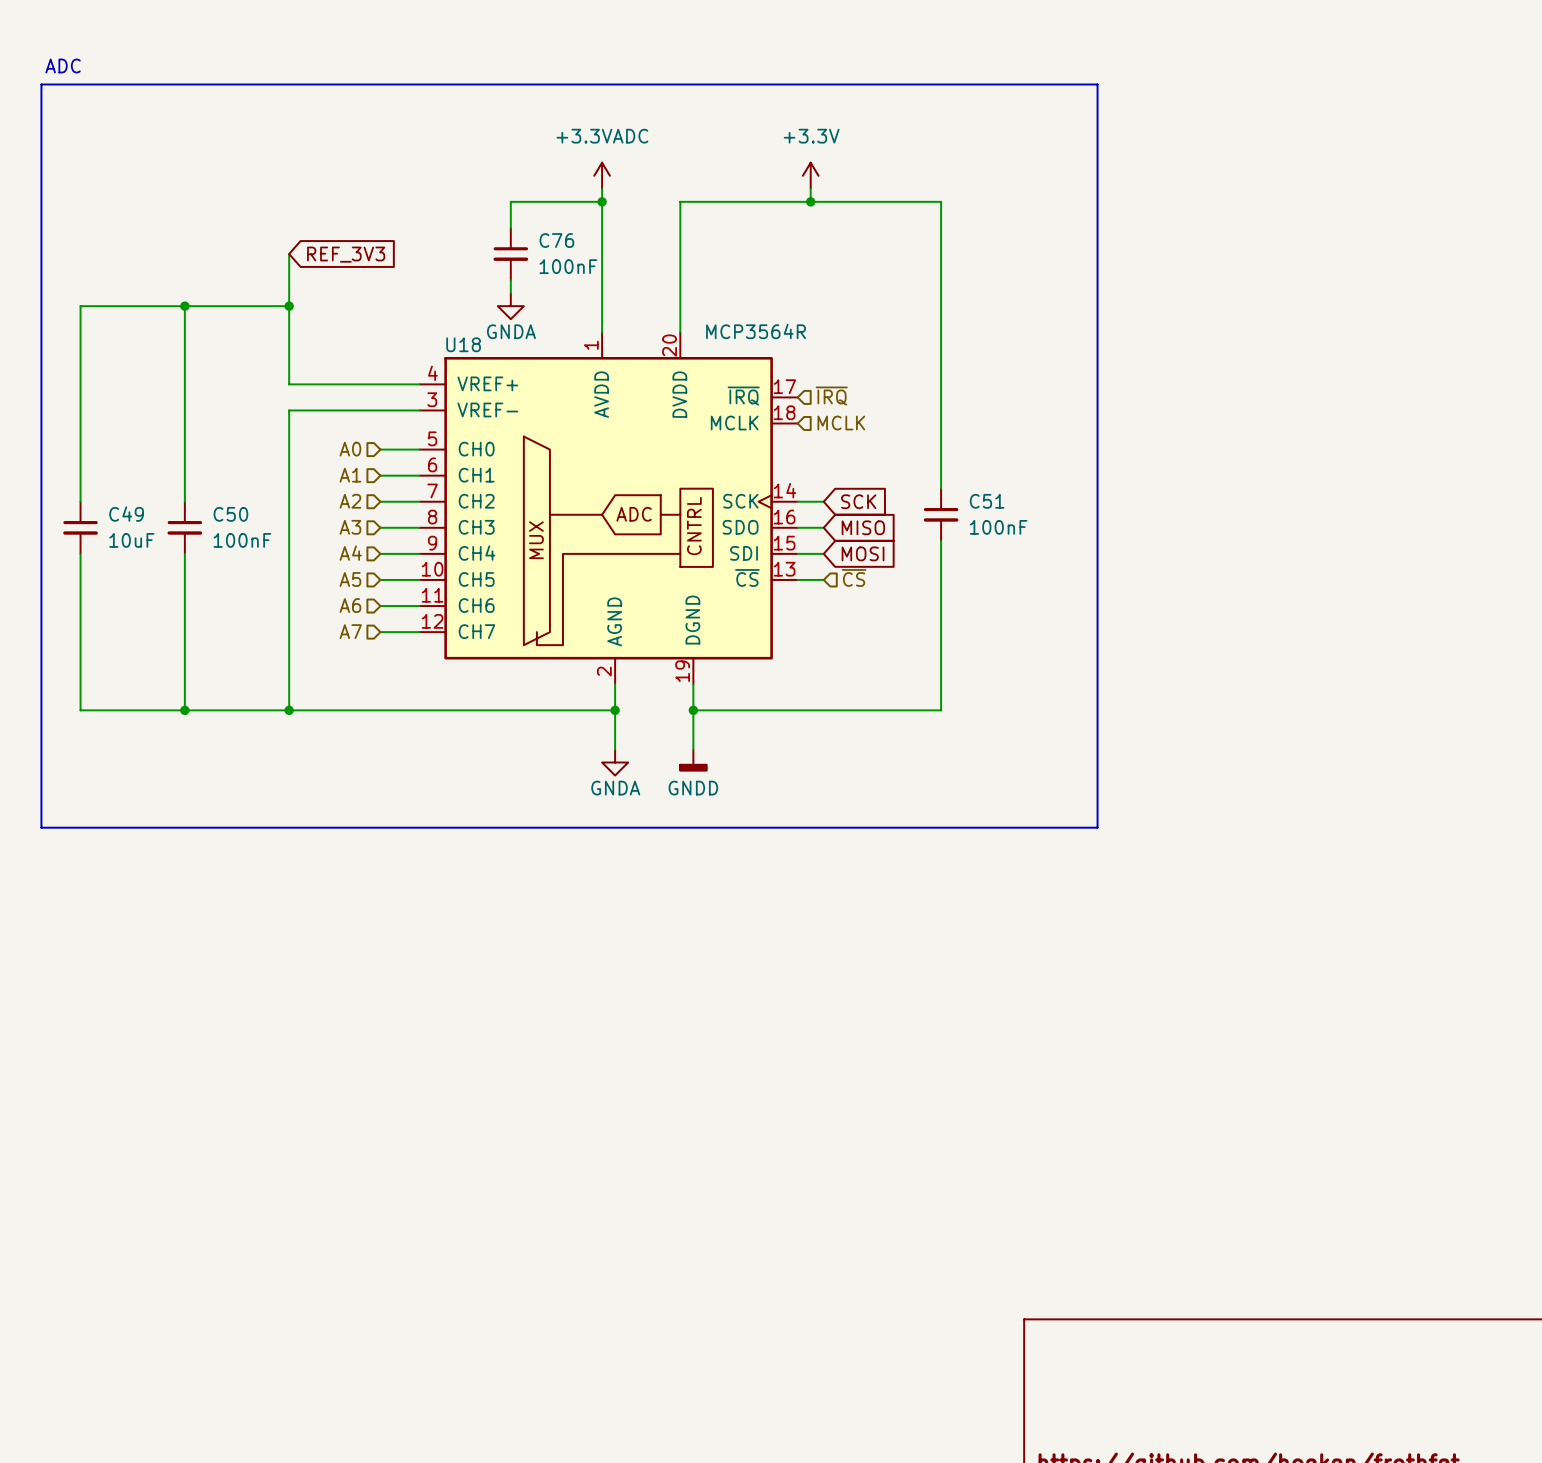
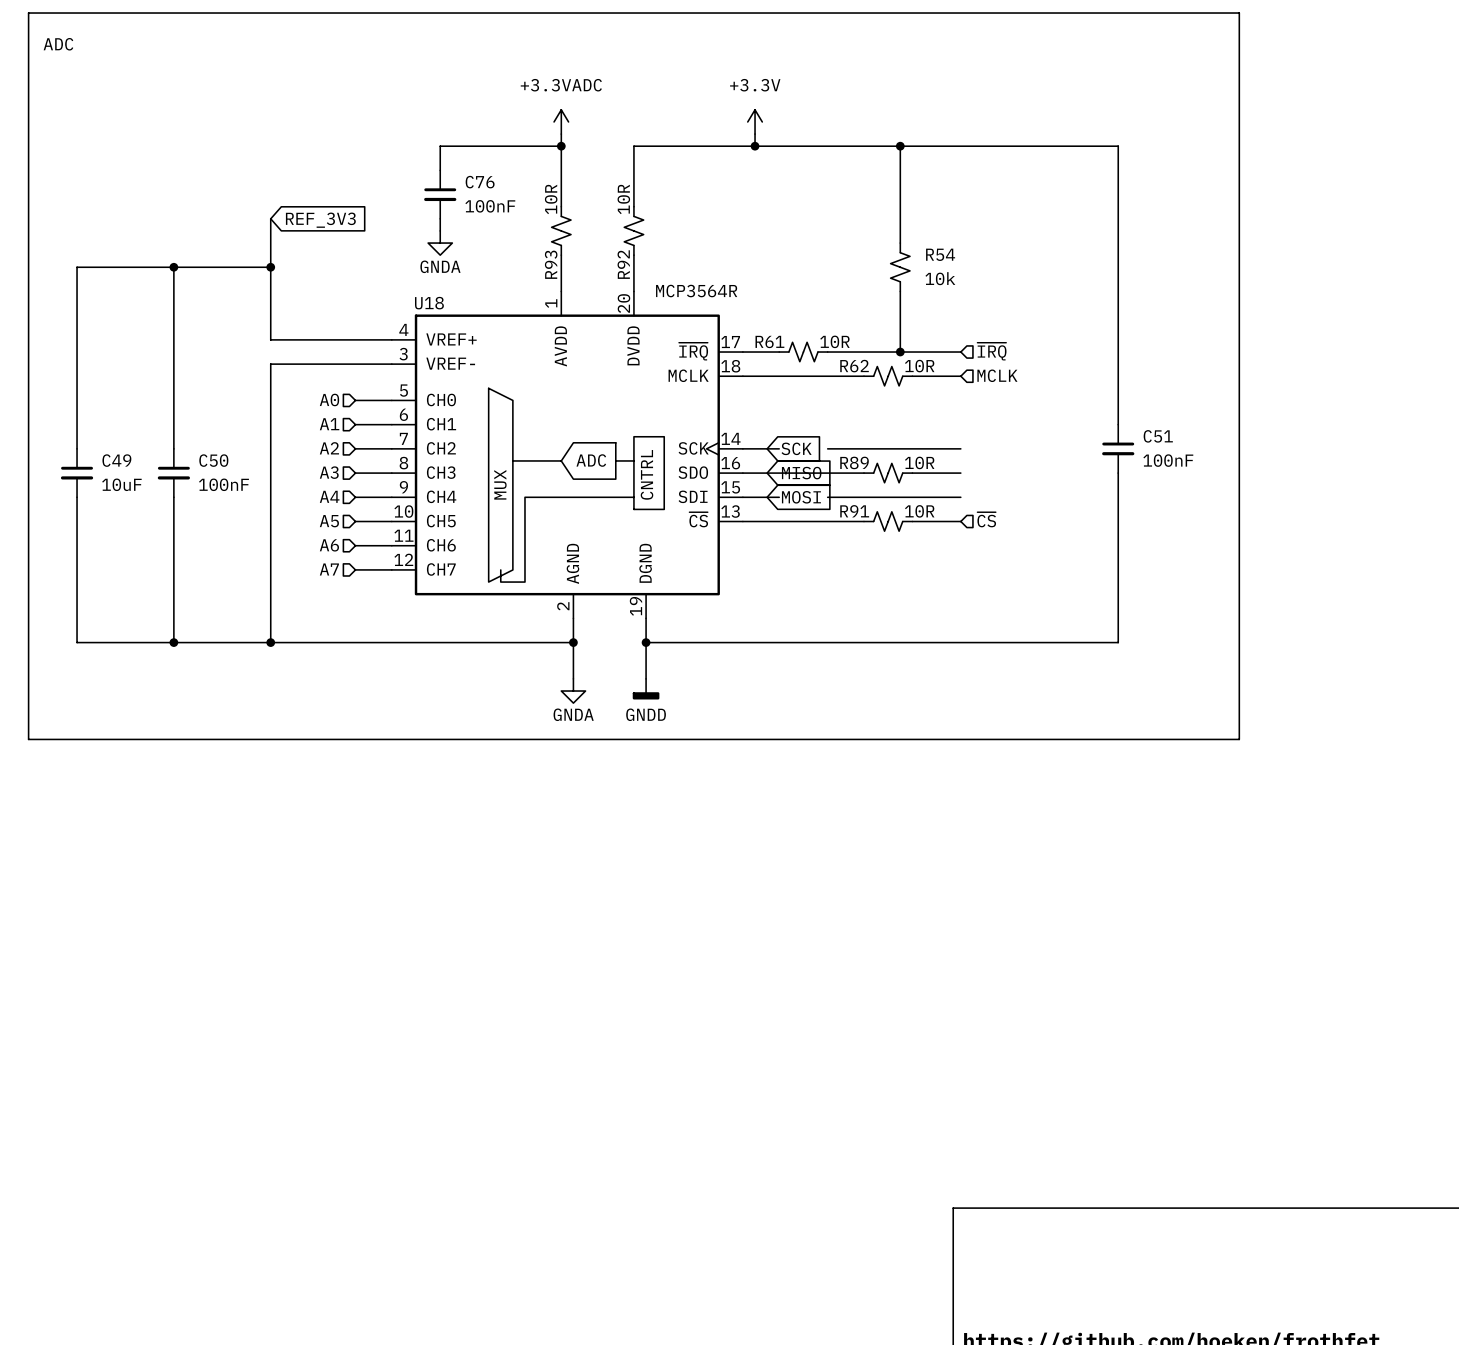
line: (41, 84) (1097, 84) (1097, 827) (41, 827) (41, 84) -> (28, 13) (28, 739) (1239, 739) (1239, 13) (28, 13)
wire: none -> (561, 146) (440, 146) (440, 170)
power symbol position: +3.3VADC (602, 175) -> +3.3VADC (561, 121)
power symbol position: +3.3V (810, 175) -> +3.3V (755, 121)
wire: none -> (900, 146) (900, 243)
junction: none -> (900, 146)
wire: (602, 201) (510, 201) (510, 227) -> none
junction position: (602, 201) -> (561, 146)
wire: (680, 201) (941, 201) (941, 488) -> (633, 170) (633, 146) (1118, 146) (1118, 424)
junction position: (810, 201) -> (755, 146)
C76 position: (510, 254) -> (440, 194)
R93: none -> 10R (561, 230)
R92: none -> 10R (633, 230)
wire: (510, 280) (510, 293) -> (440, 218) (440, 230)
power symbol position: GNDA (510, 306) -> GNDA (440, 243)
R54: none -> 10k (900, 267)
wire: none -> (900, 291) (900, 352)
hierarchical label position: ~{IRQ} (831, 396) -> ~{IRQ} (991, 351)
wire: none -> (742, 352) (779, 352)
R61: none -> 10R (803, 352)
wire: none -> (827, 352) (960, 352)
junction: none -> (900, 352)
wire: none -> (742, 376) (863, 376)
hierarchical label position: MCLK (841, 423) -> MCLK (997, 375)
R62: none -> 10R (888, 376)
wire: none -> (912, 376) (960, 376)
wire: none -> (767, 448) (779, 448)
wire: none -> (827, 448) (960, 448)
C51 position: (941, 514) -> (1118, 448)
wire: none -> (767, 473) (863, 473)
R89: none -> 10R (888, 473)
wire: none -> (912, 473) (960, 473)
wire: (941, 540) (941, 710) -> (1118, 473) (1118, 642) (876, 642)
wire: none -> (767, 497) (779, 497)
wire: none -> (827, 497) (960, 497)
hierarchical label position: ~{CS} (854, 577) -> ~{CS} (986, 519)
wire: none -> (767, 521) (863, 521)
R91: none -> 10R (888, 521)
wire: none -> (912, 521) (960, 521)

